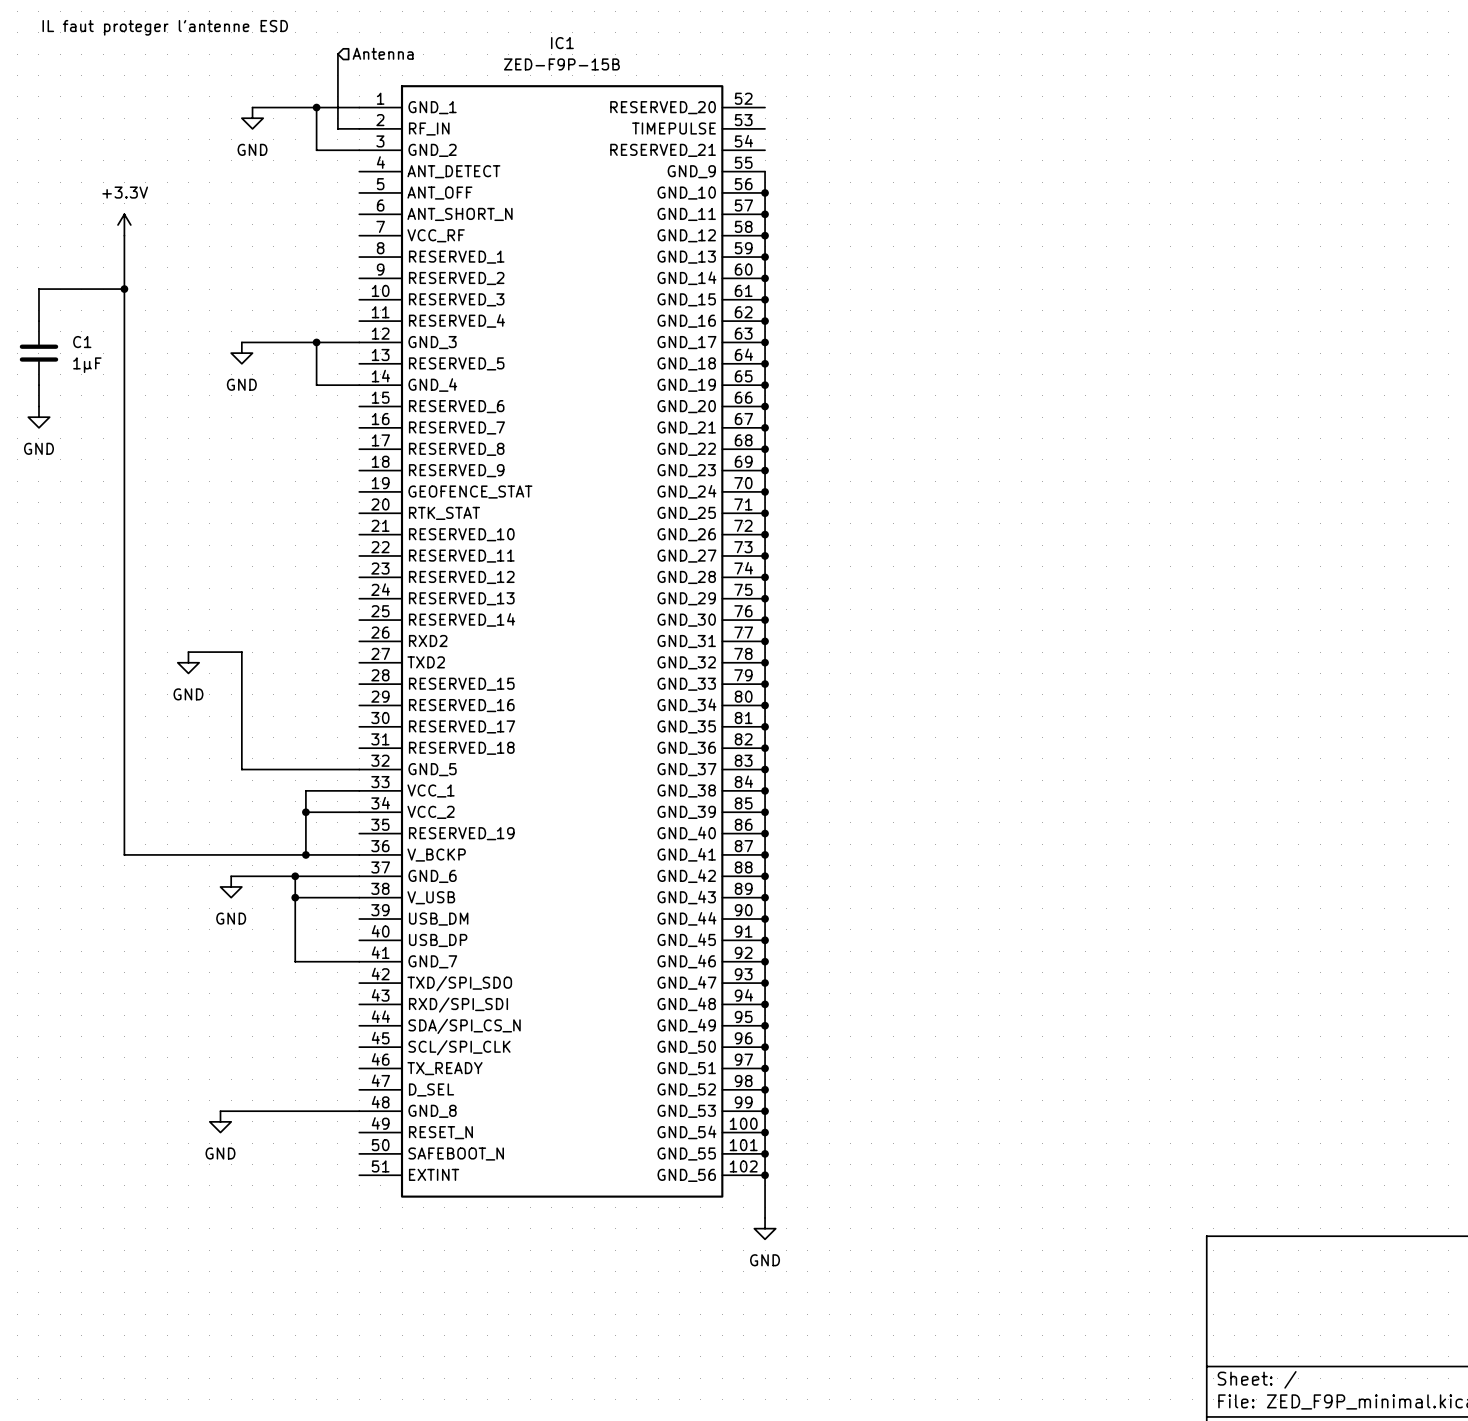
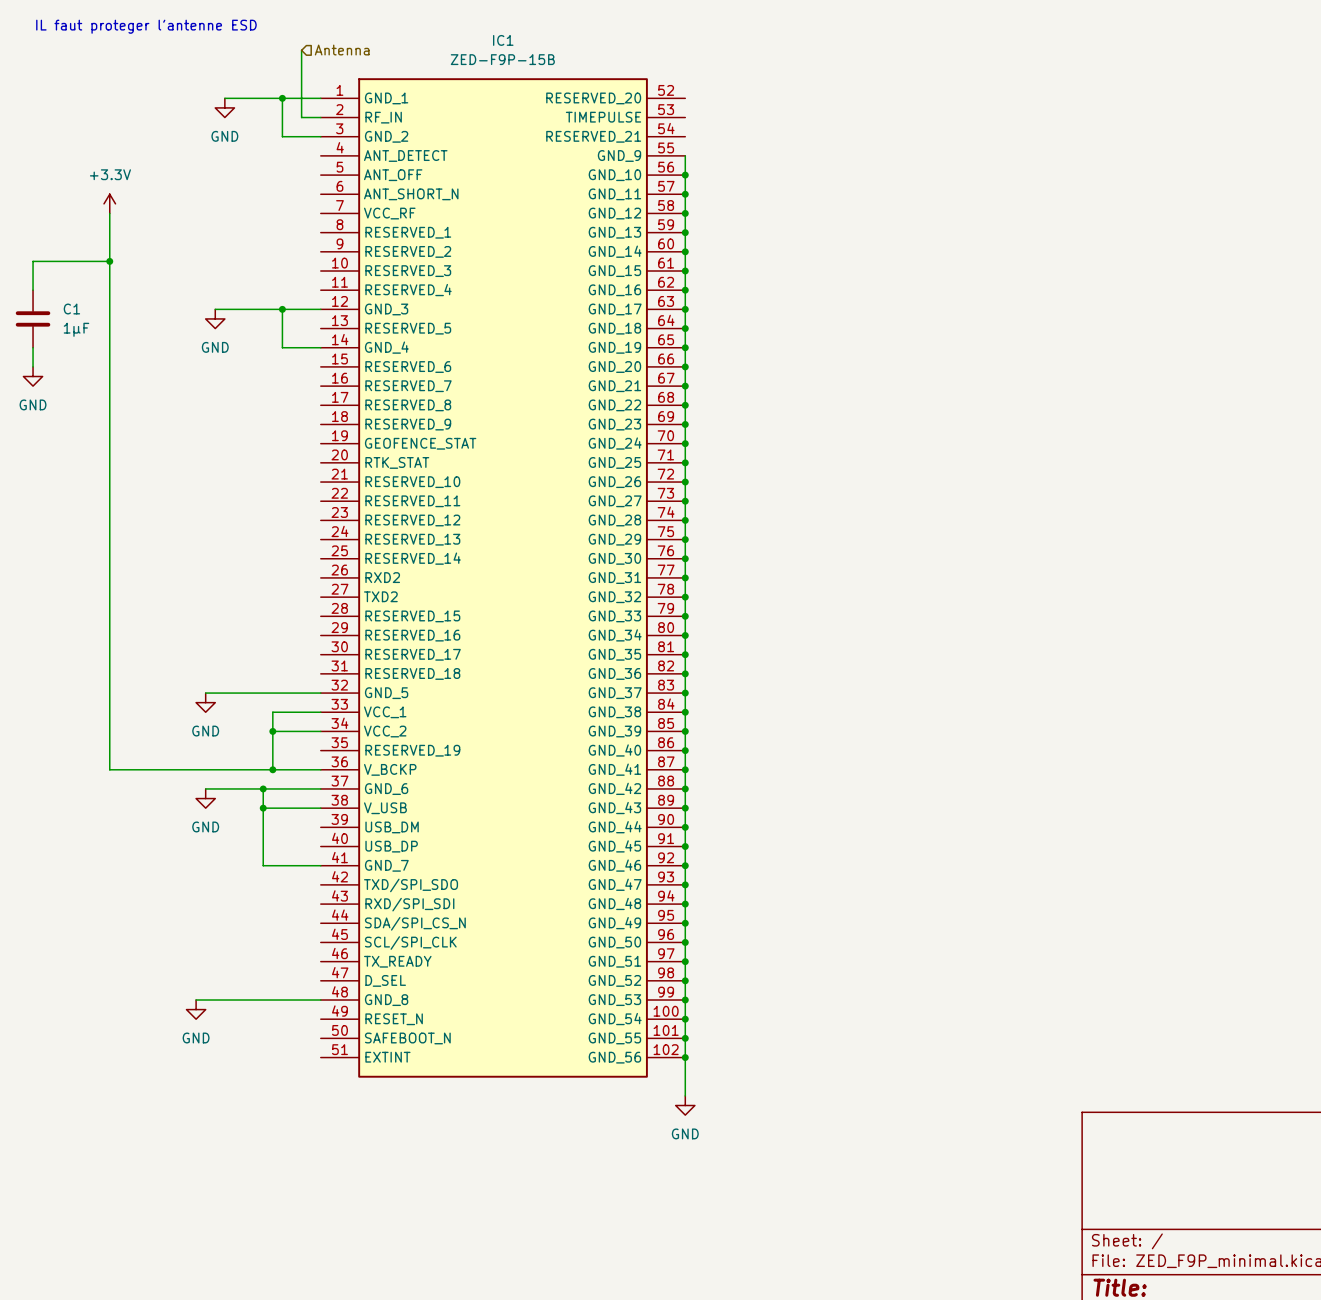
wire: (188, 652) (241, 652) (241, 769) -> (205, 693) (215, 693)
power symbol position: GND (188, 662) -> GND (205, 702)

